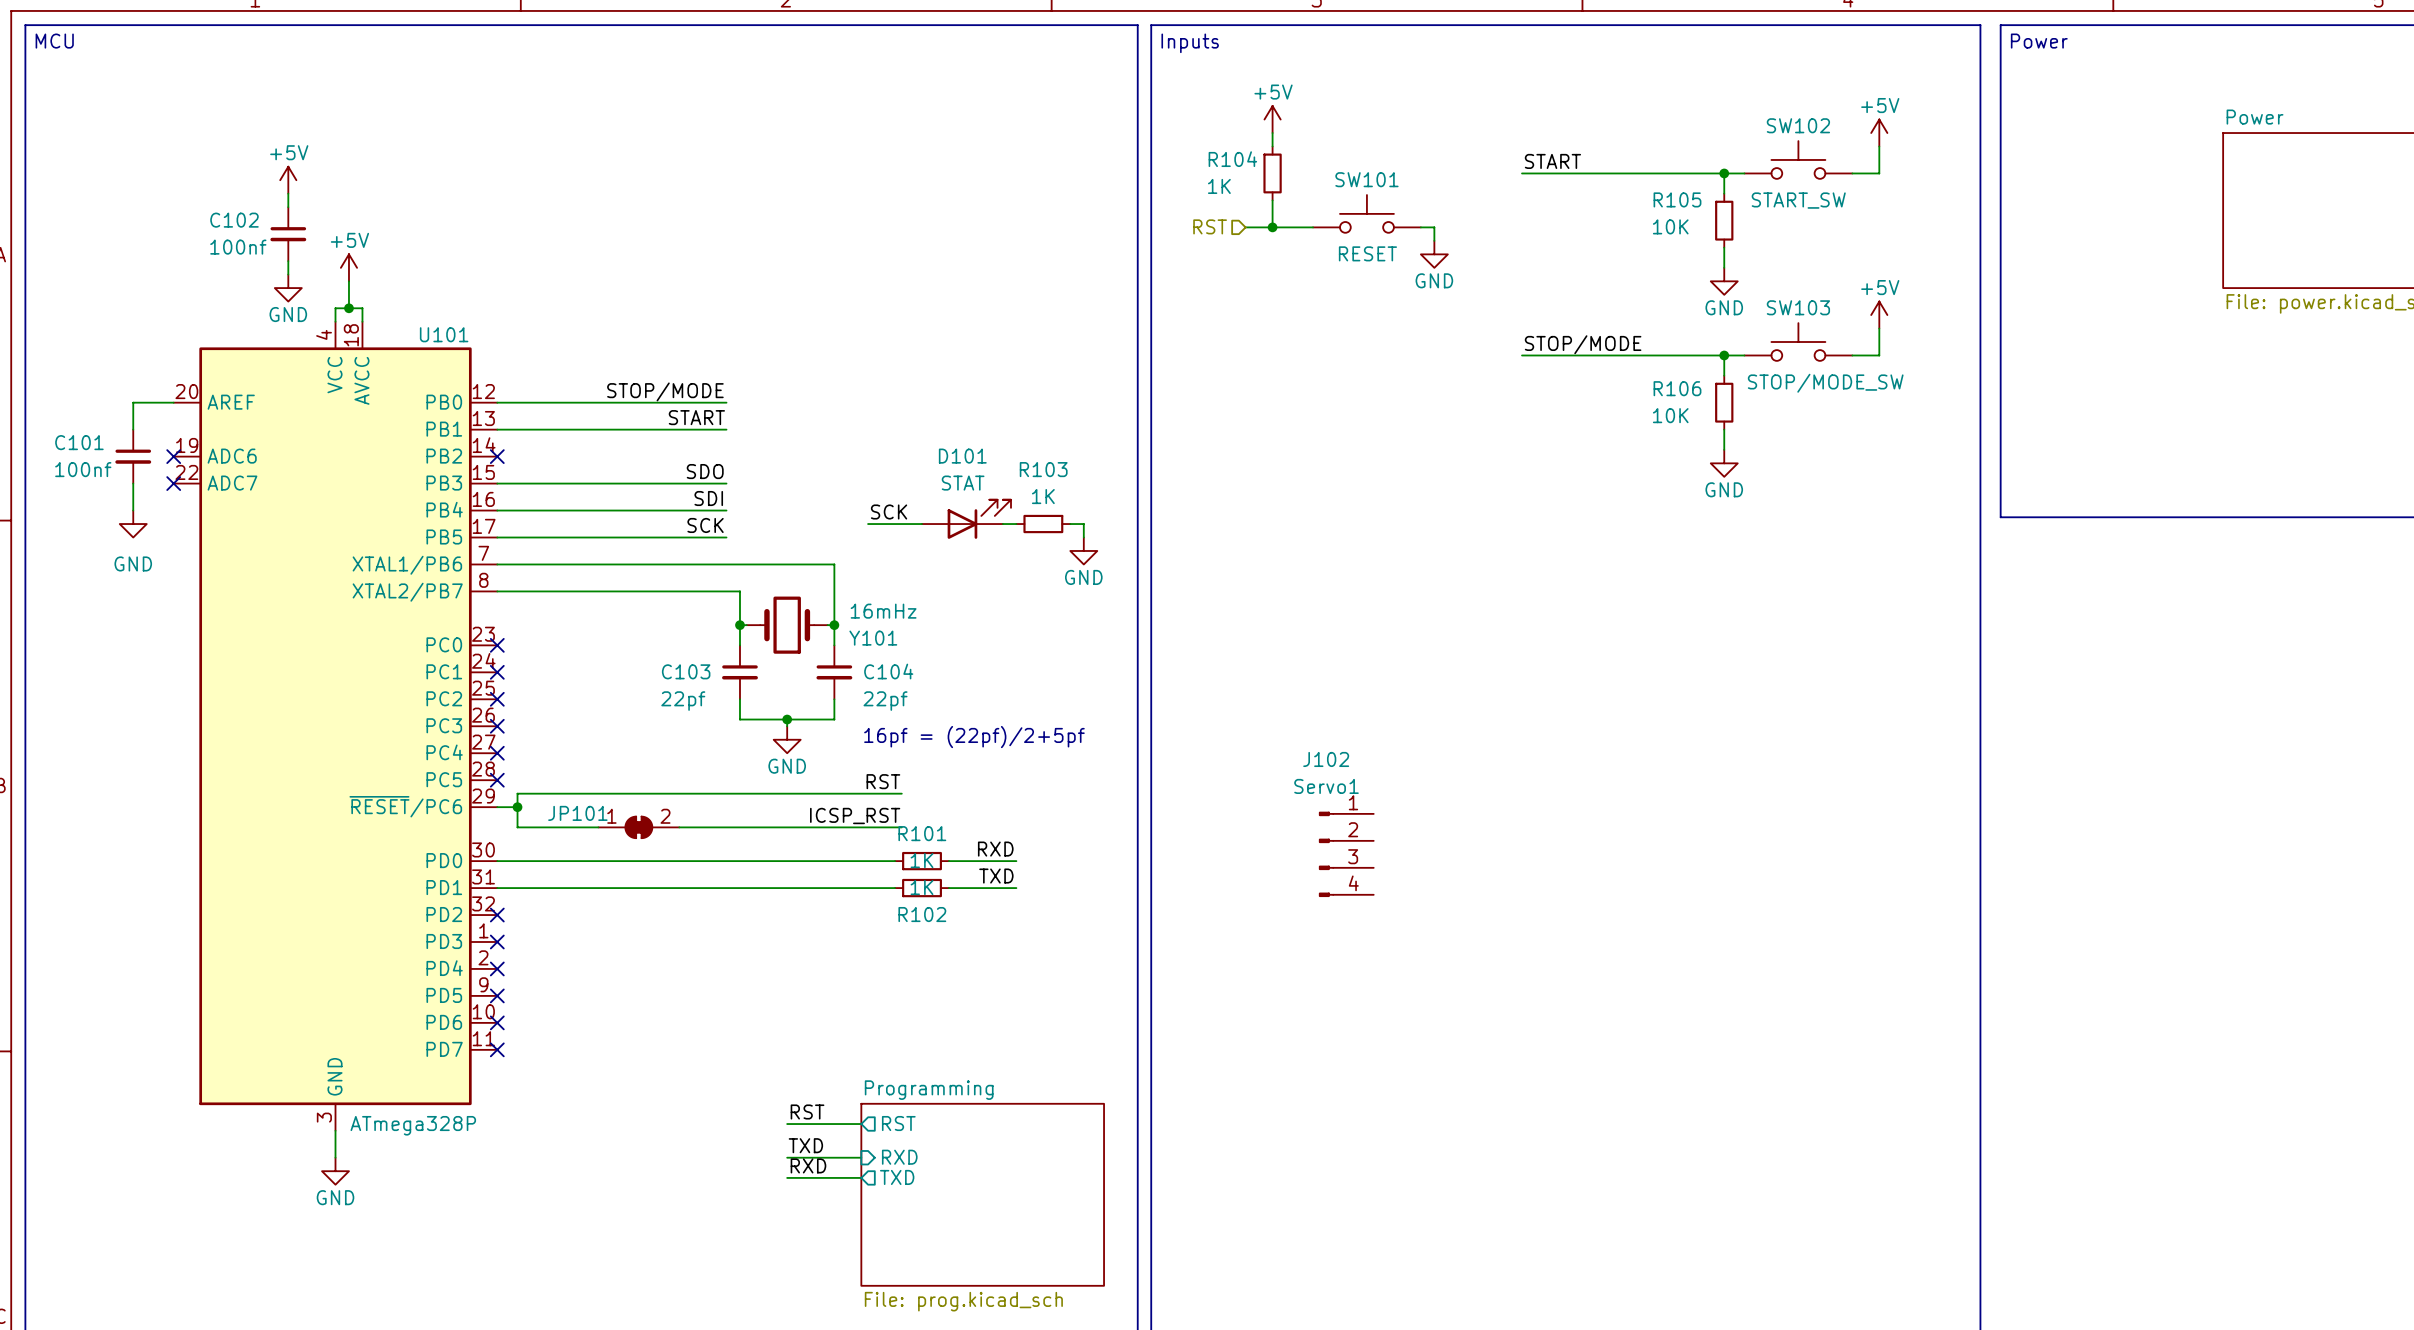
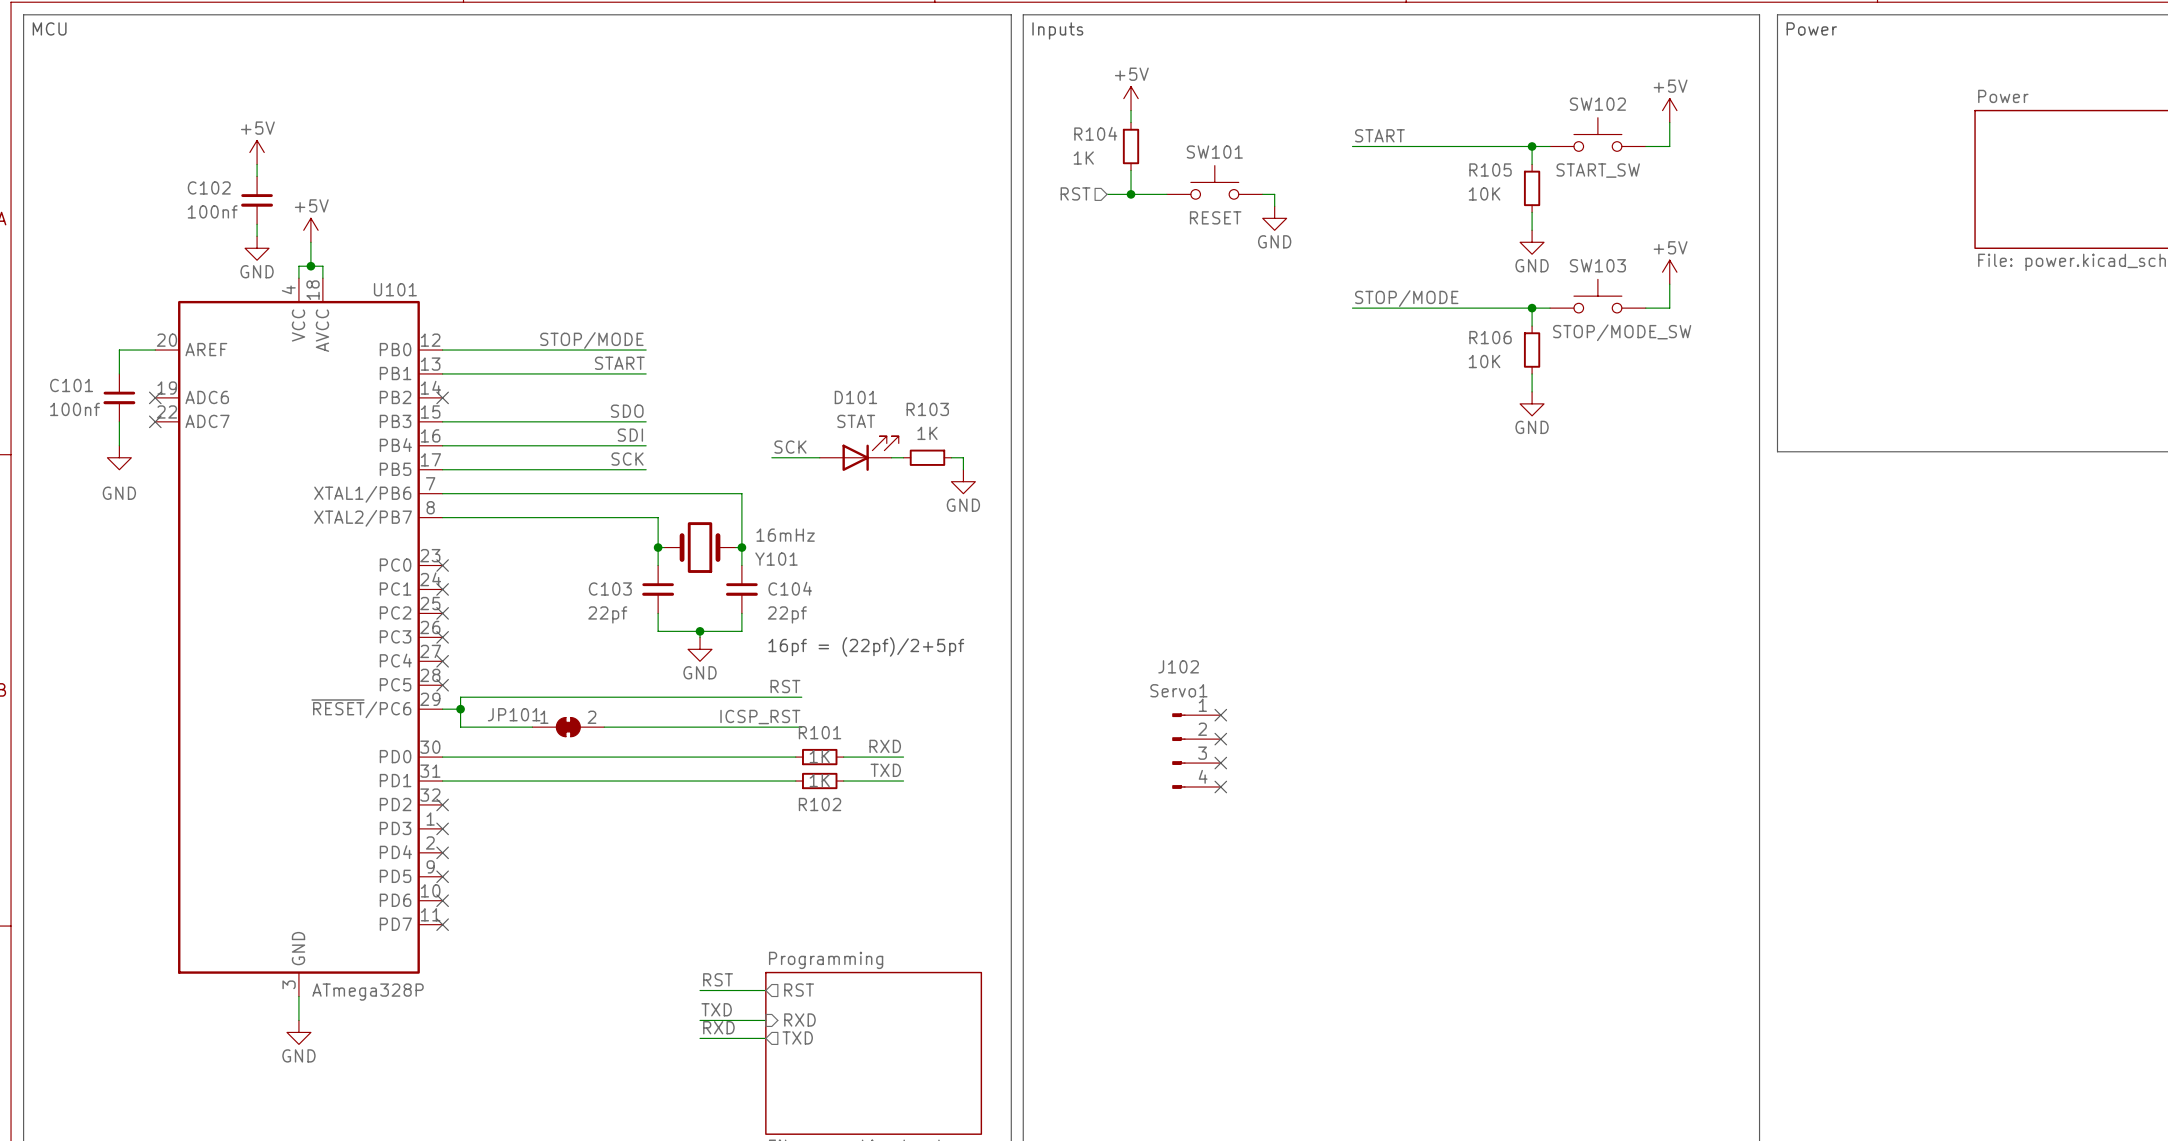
no-connect mark: none -> (1220, 715)
no-connect mark: none -> (1220, 739)
no-connect mark: none -> (1220, 763)
no-connect mark: none -> (1220, 786)

